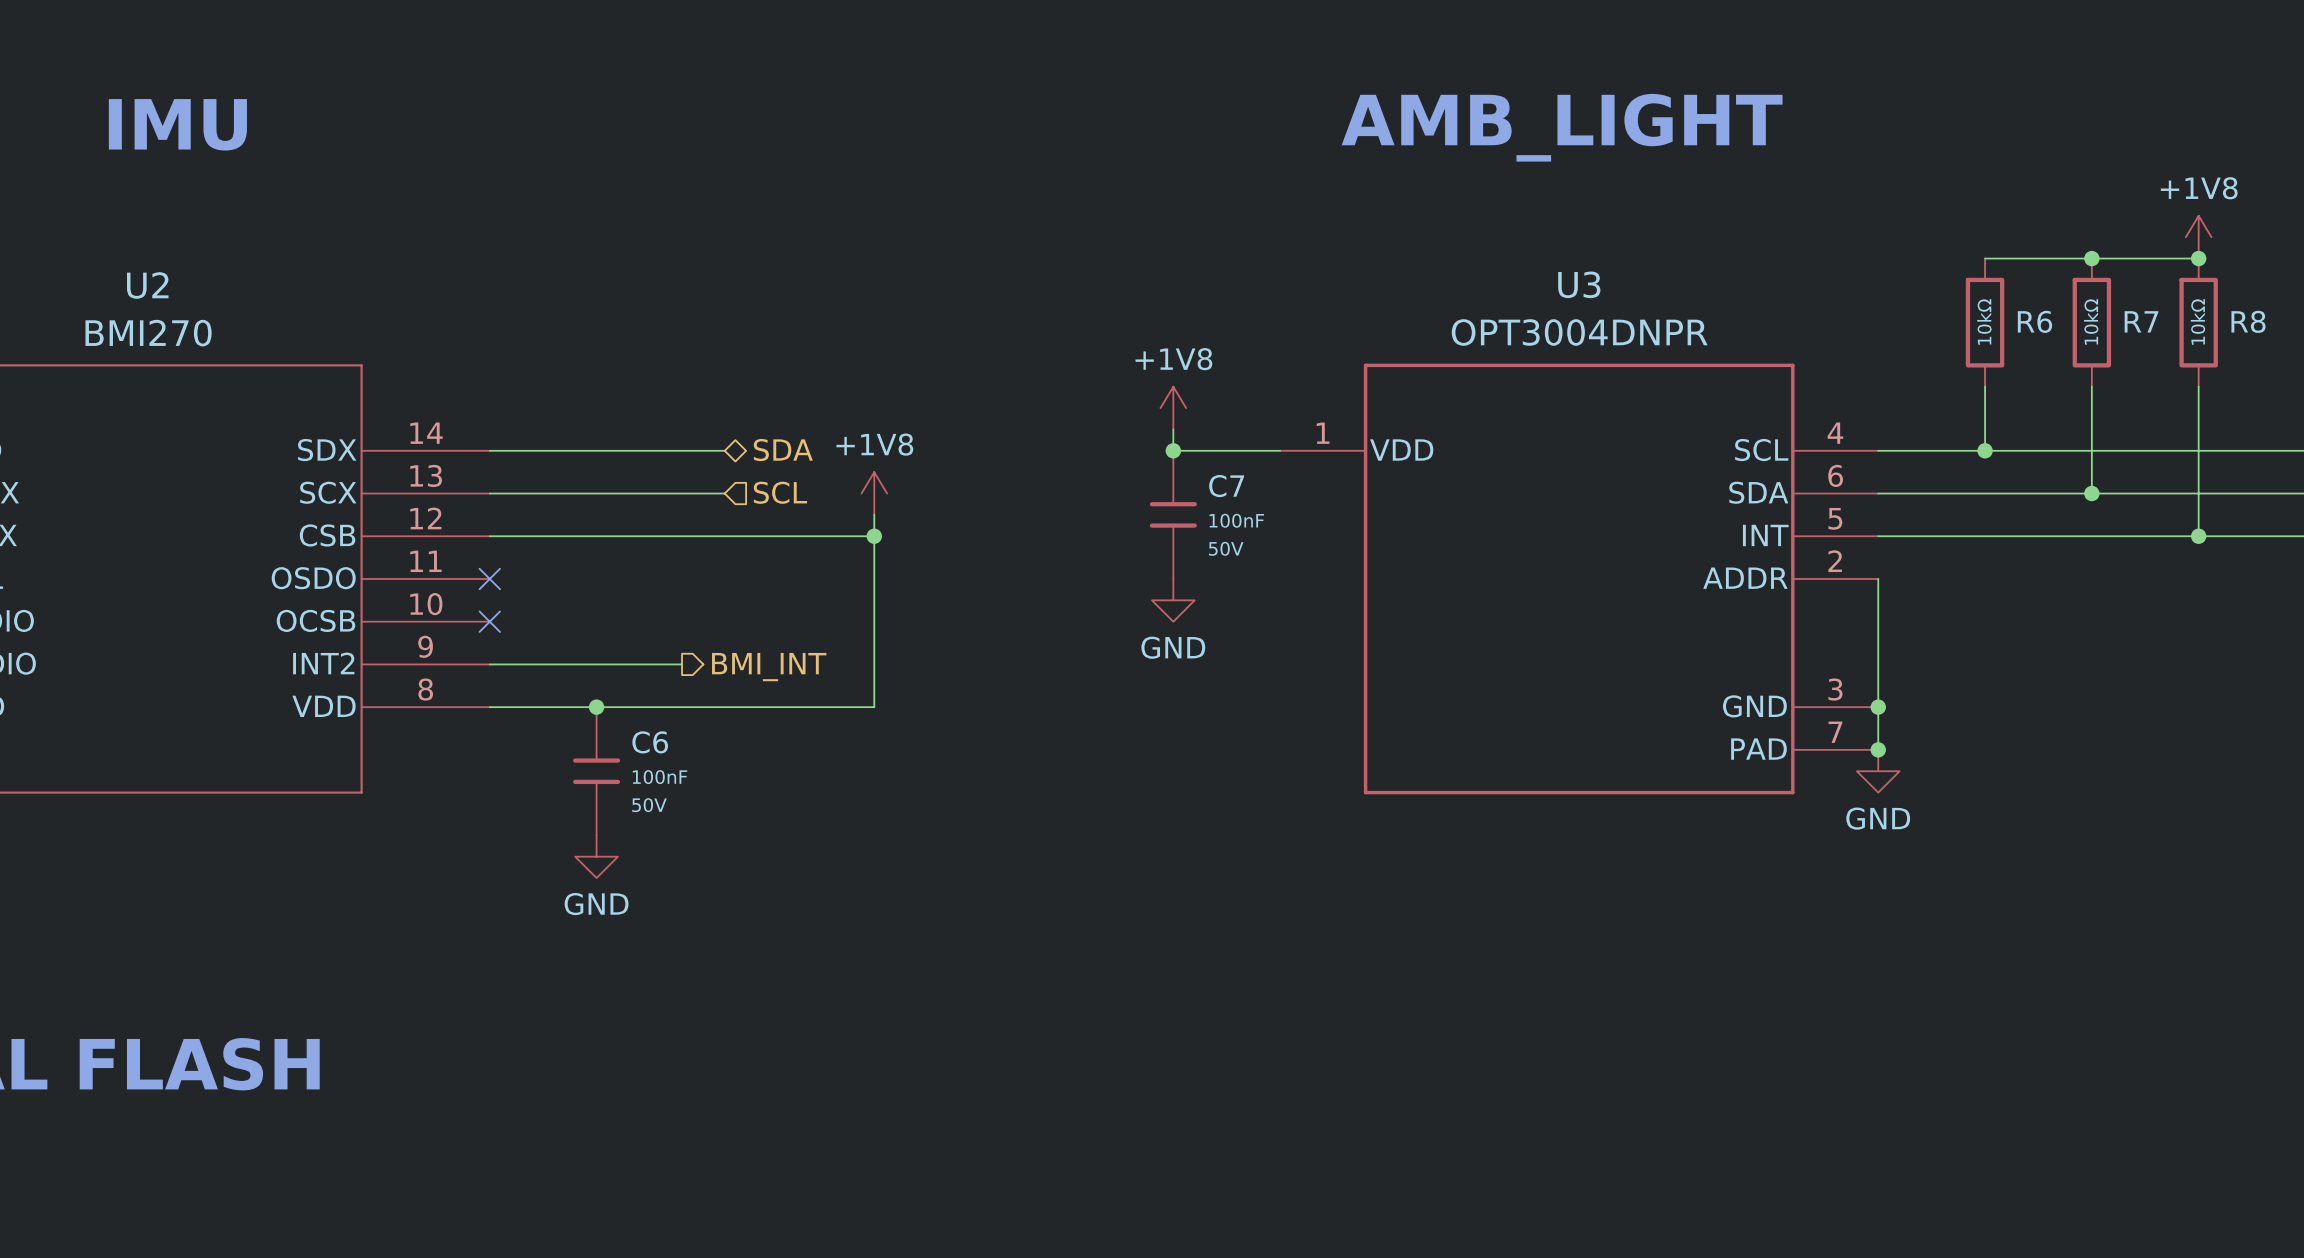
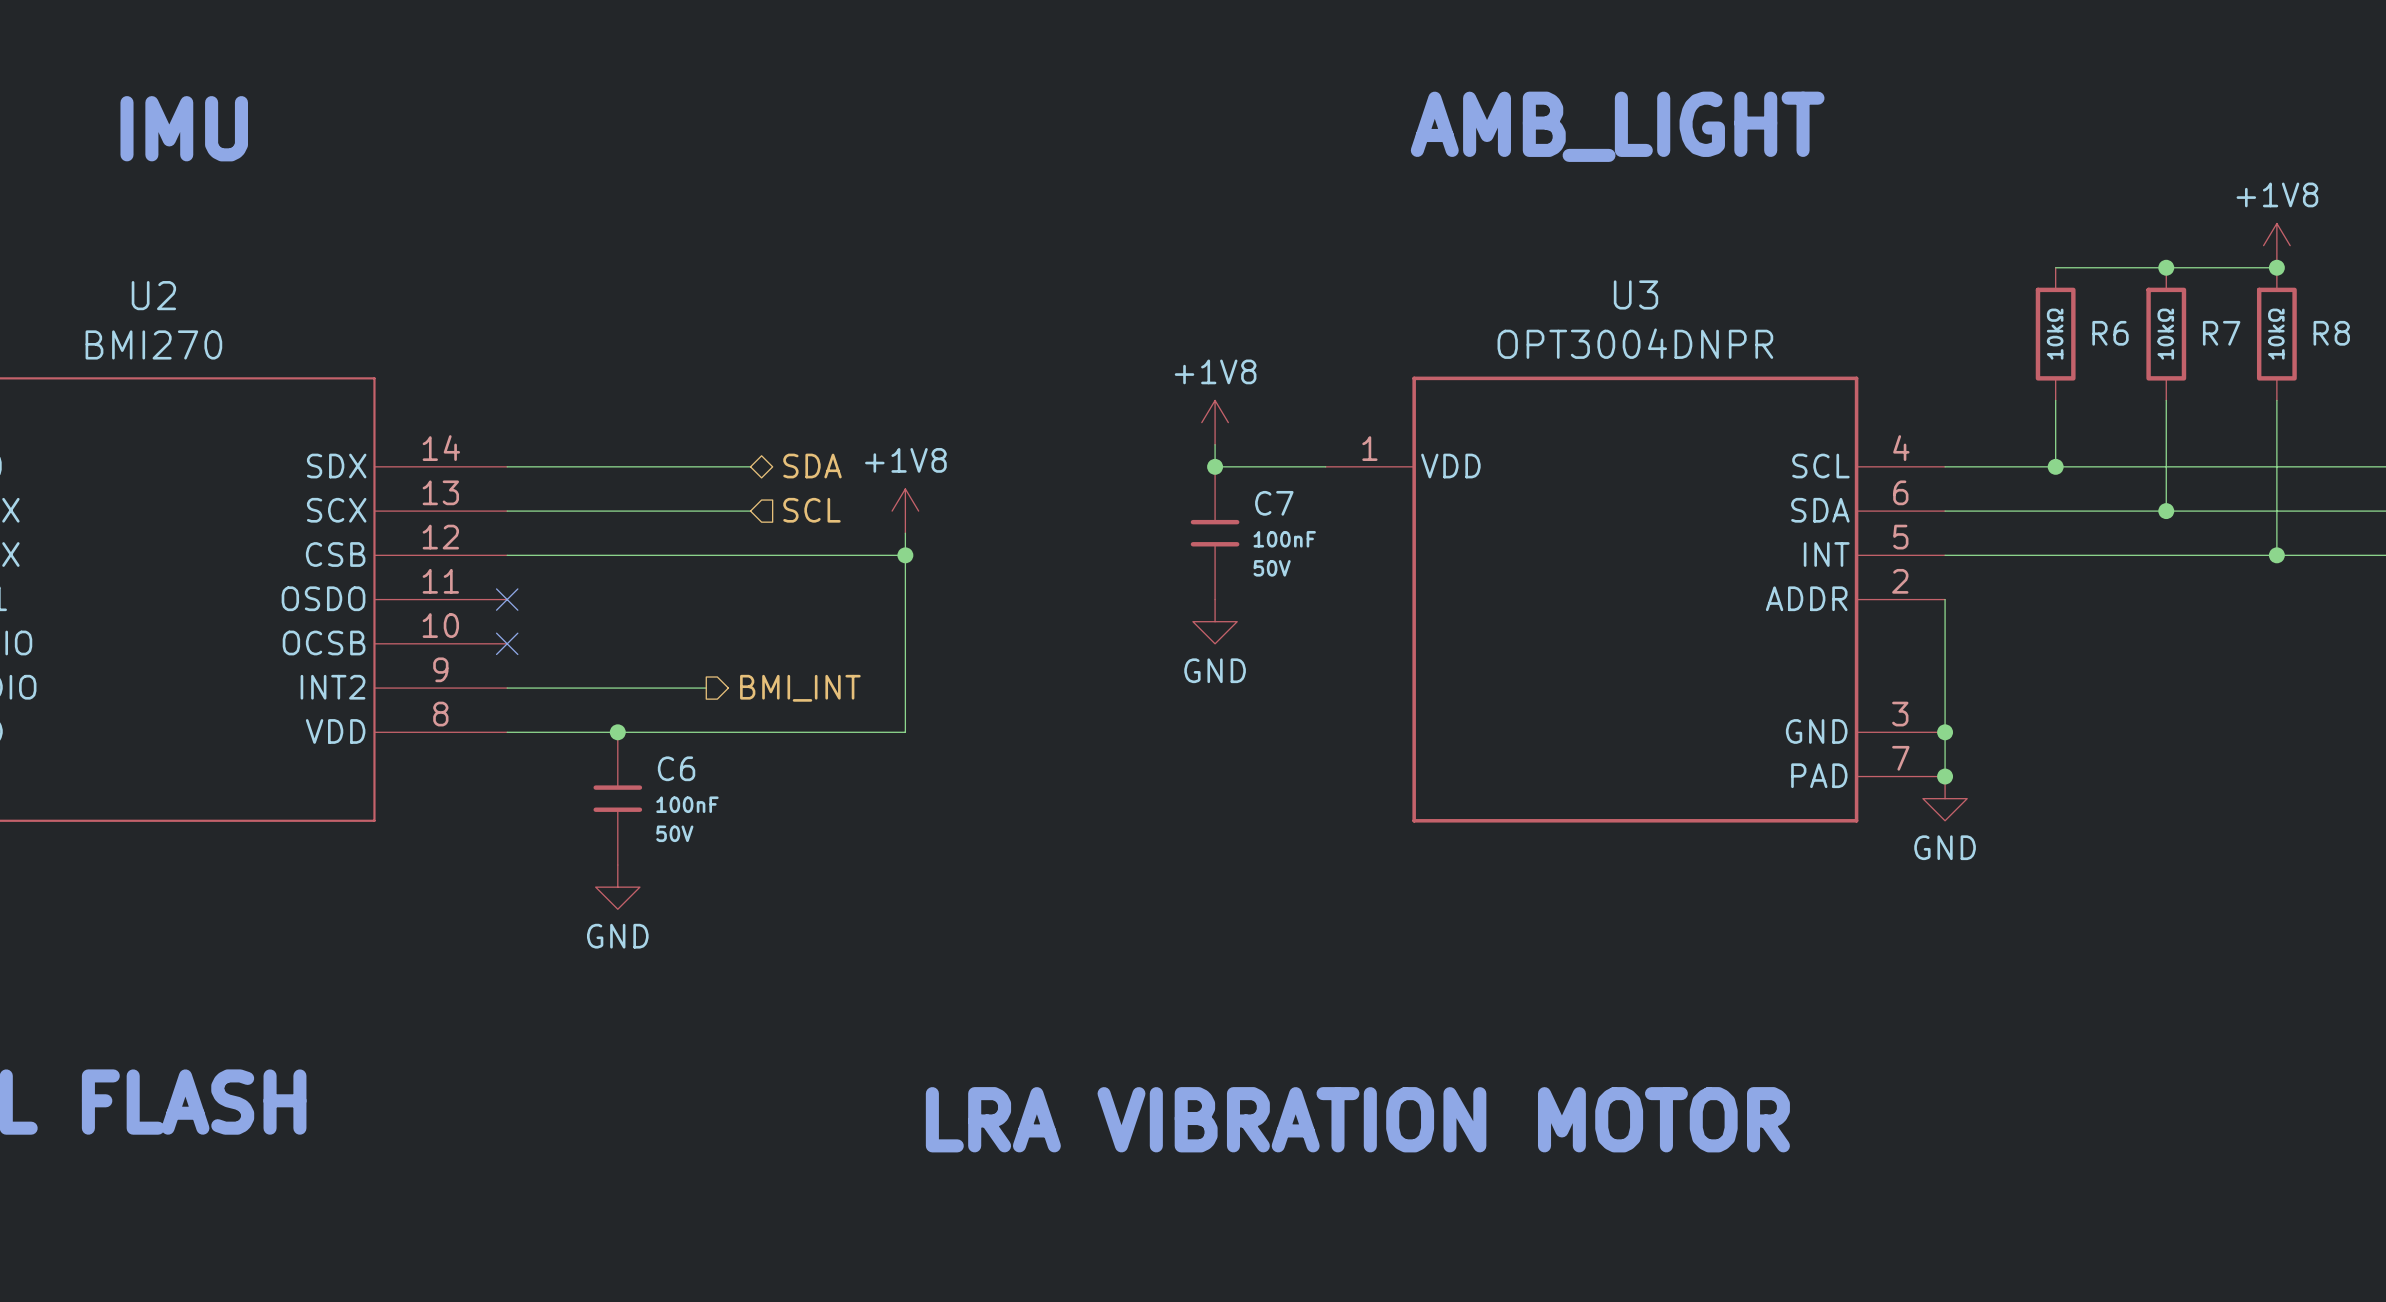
text: none -> LRA VIBRATION MOTOR (1357, 1119)

